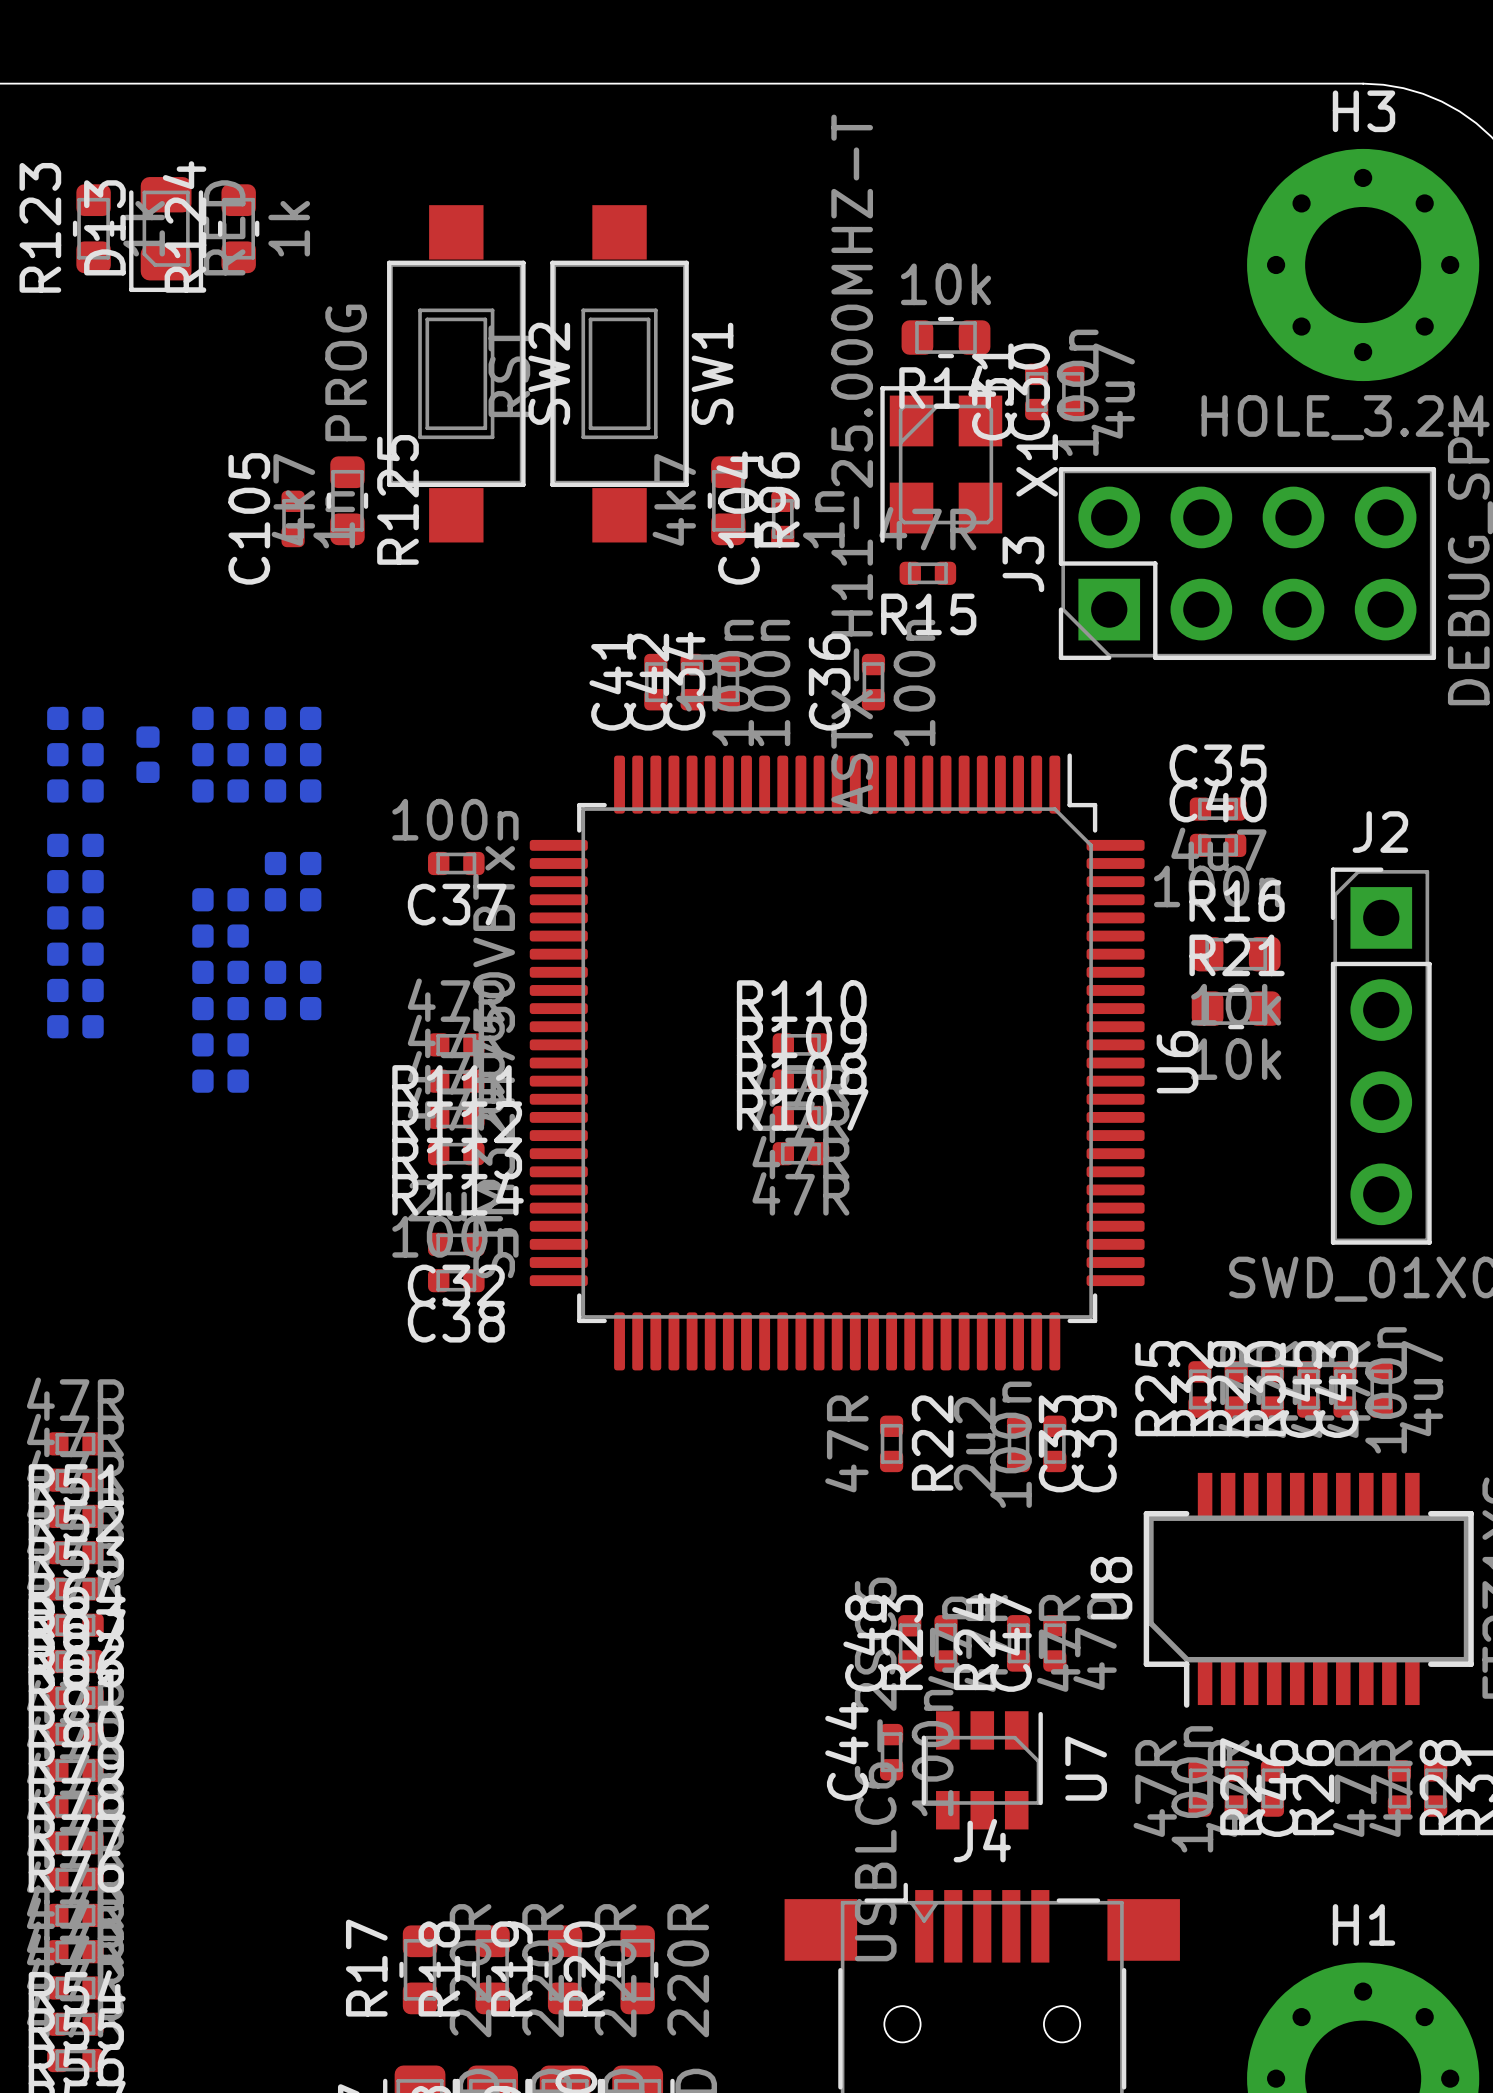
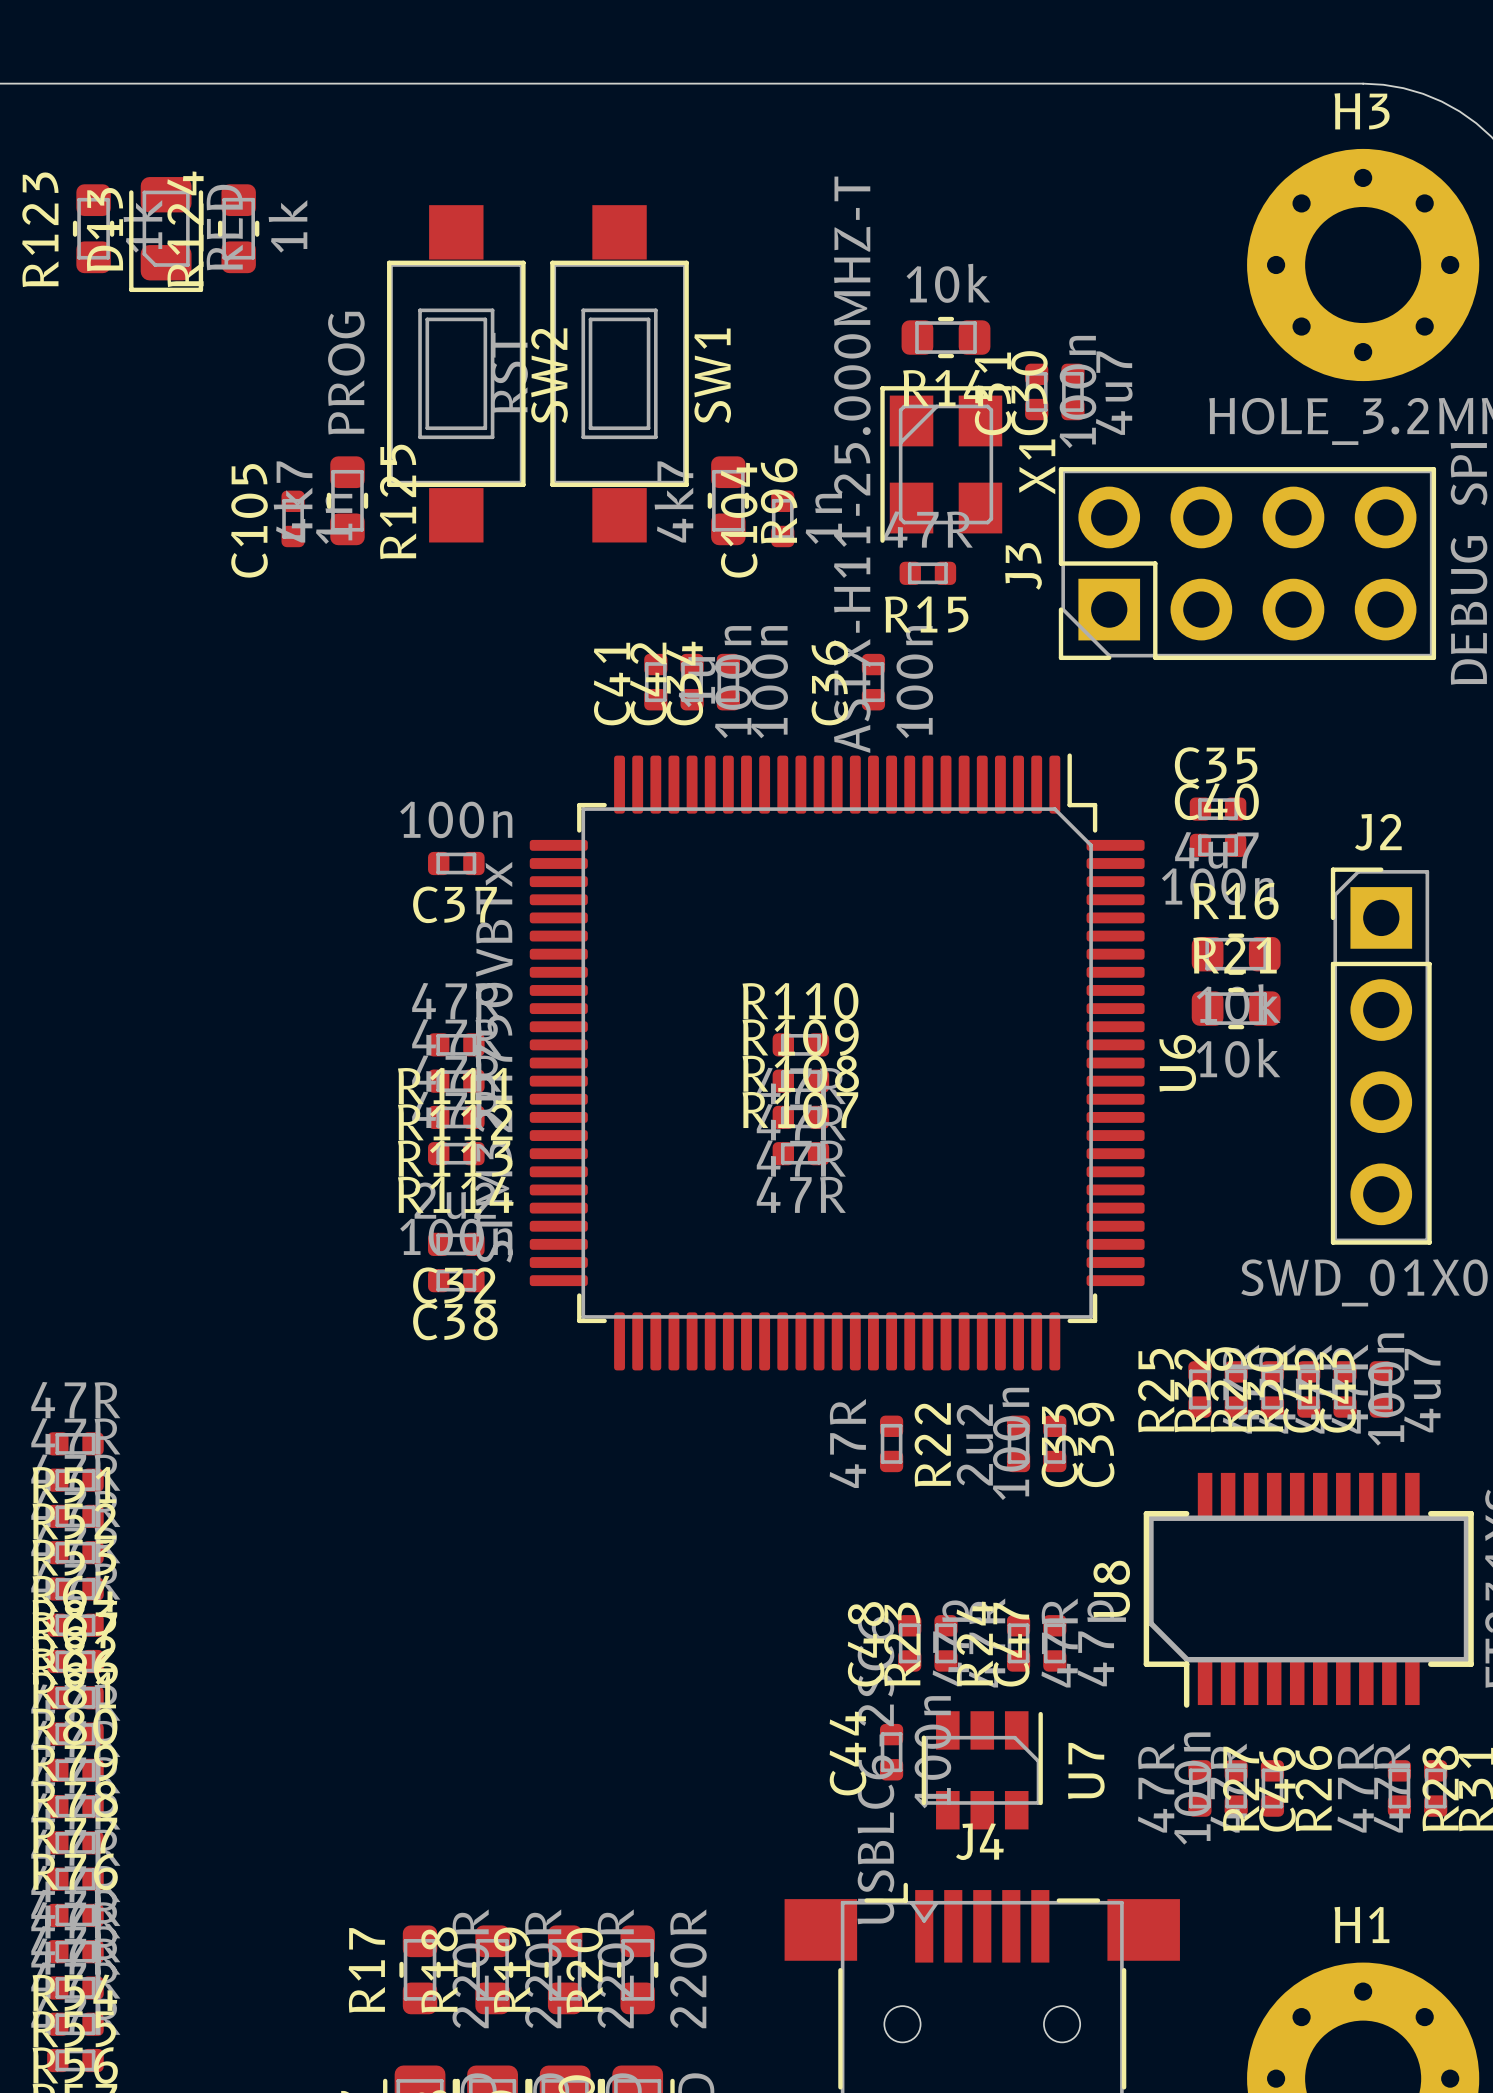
part: (75, 718) -> none
part: (220, 718) -> none
part: (293, 718) -> none
part: (75, 754) -> none
part: (147, 754) -> none
part: (220, 754) -> none
part: (293, 754) -> none
part: (75, 790) -> none
part: (220, 790) -> none
part: (293, 790) -> none
part: (75, 845) -> none
part: (293, 863) -> none
part: (75, 881) -> none
part: (220, 899) -> none
part: (293, 899) -> none
part: (75, 917) -> none
part: (220, 936) -> none
part: (75, 954) -> none
part: (220, 972) -> none
part: (293, 972) -> none
part: (75, 990) -> none
part: (220, 1008) -> none
part: (293, 1008) -> none
part: (75, 1026) -> none
part: (220, 1044) -> none
part: (220, 1081) -> none

